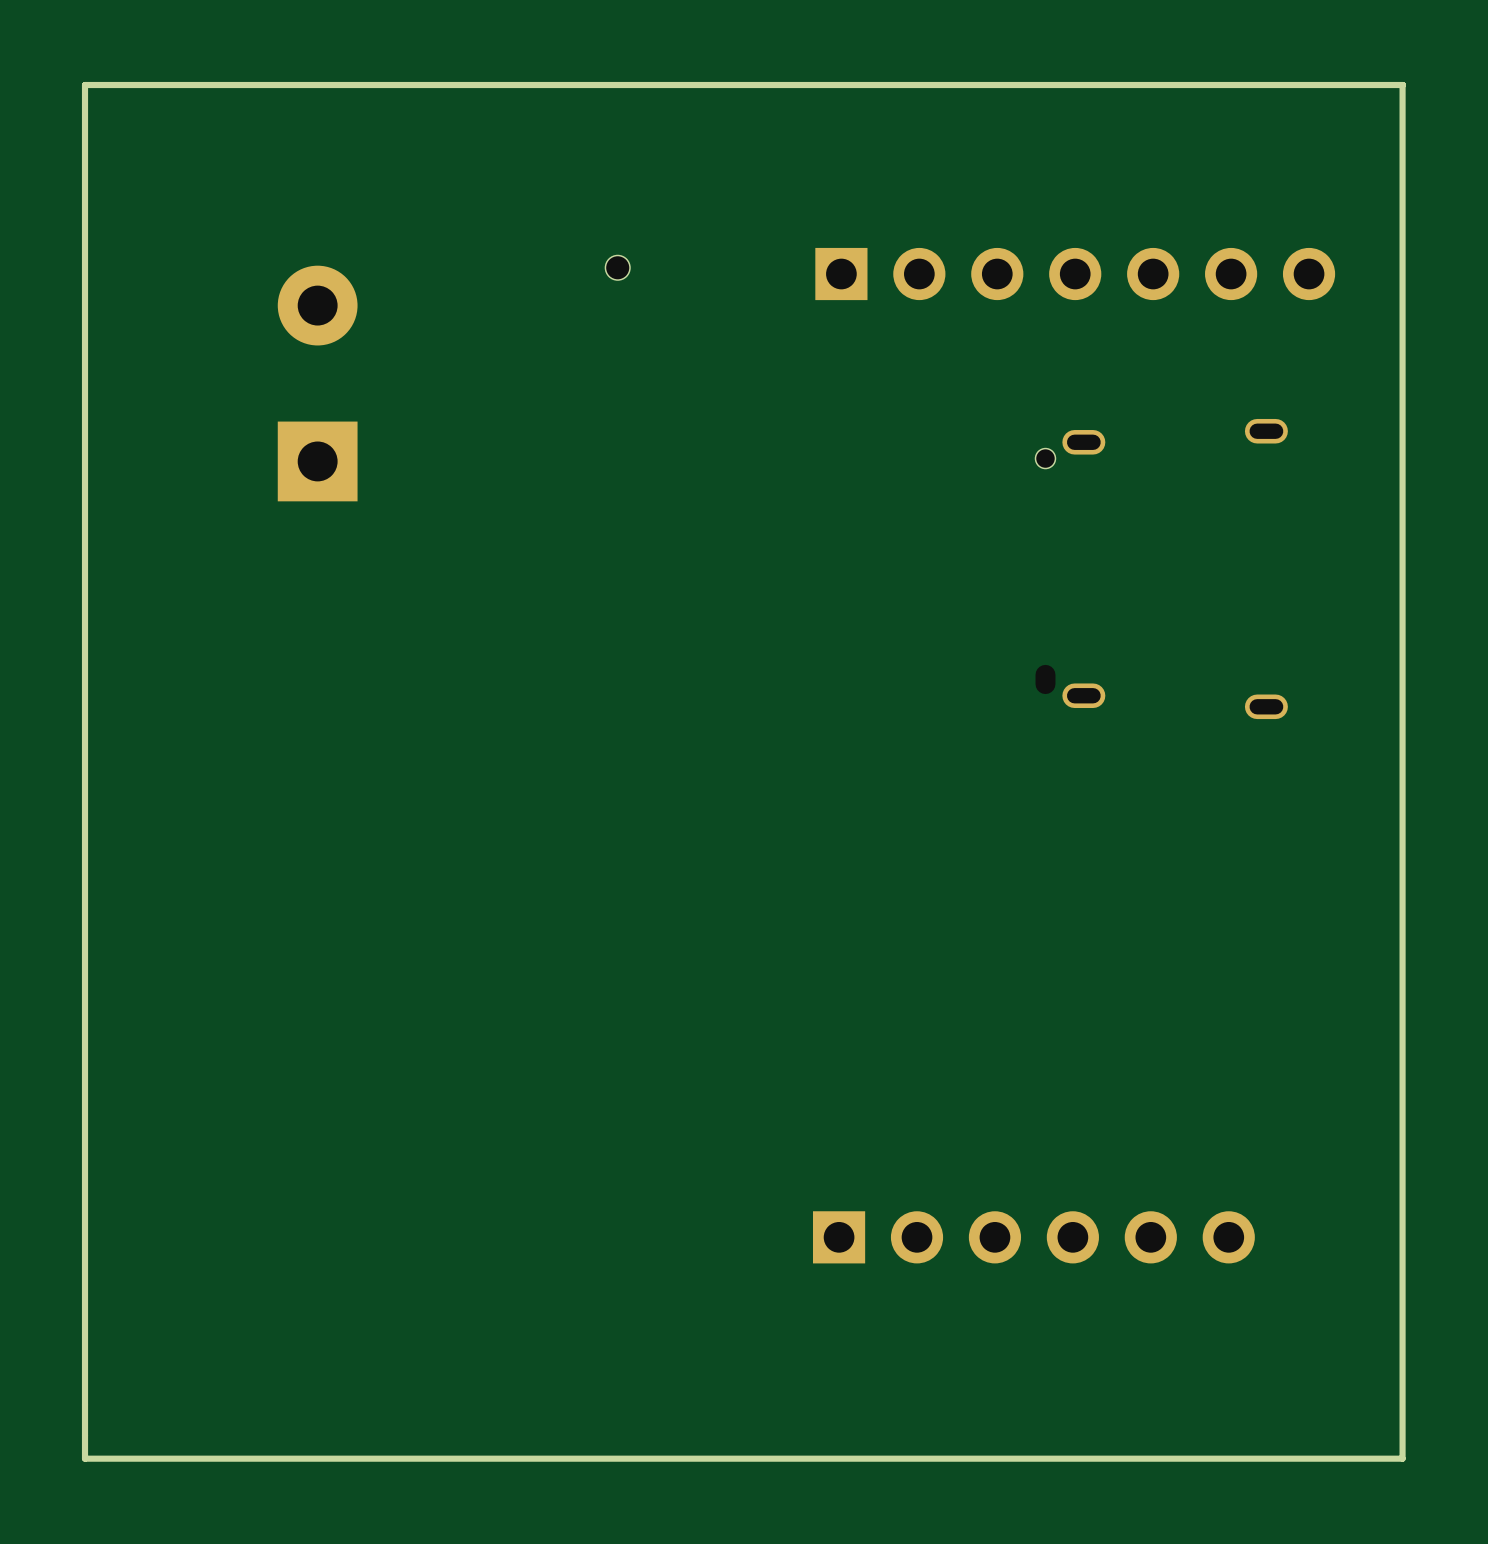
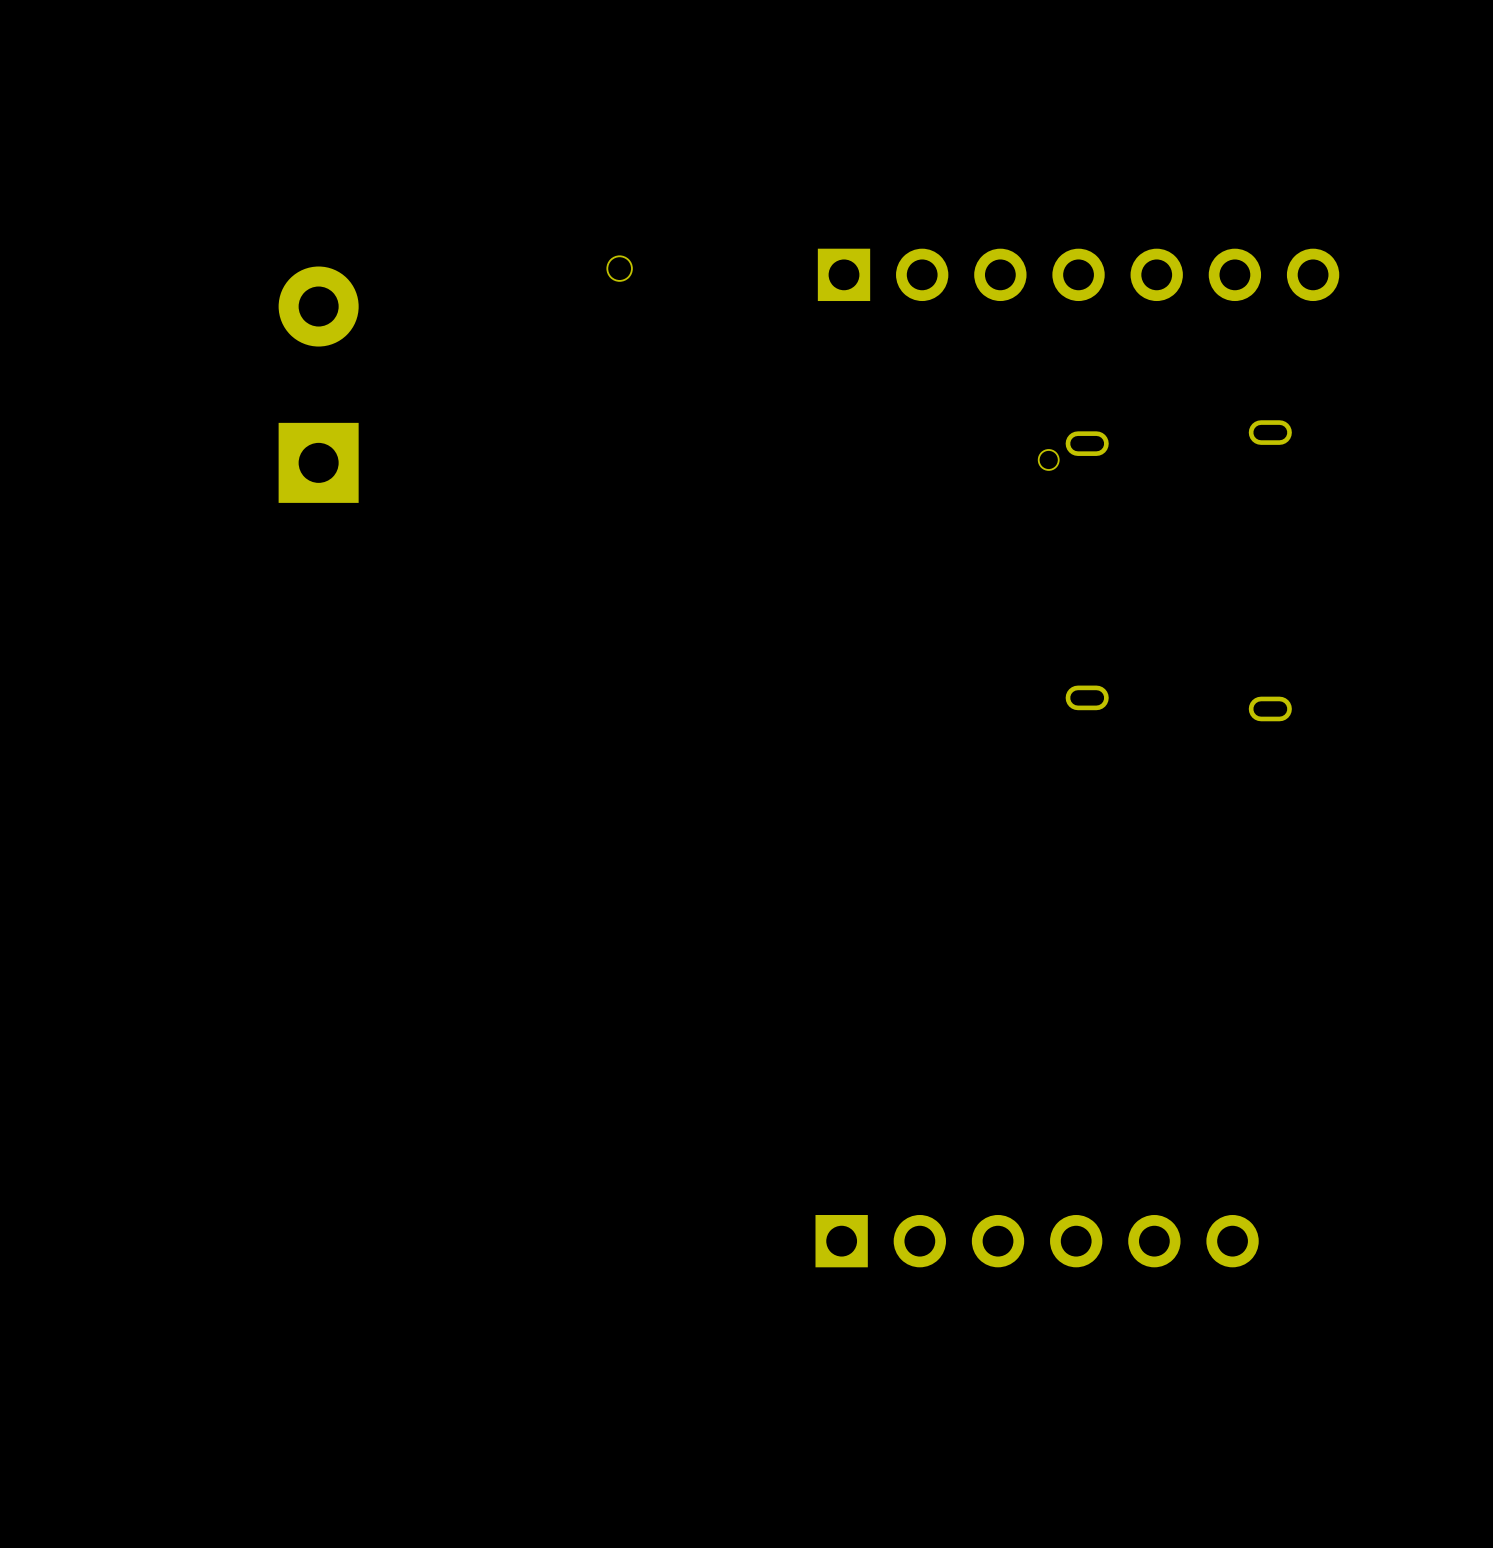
board edge: (1402, 85) (85, 85) (85, 1458) (1402, 1458) (1402, 85) -> none

